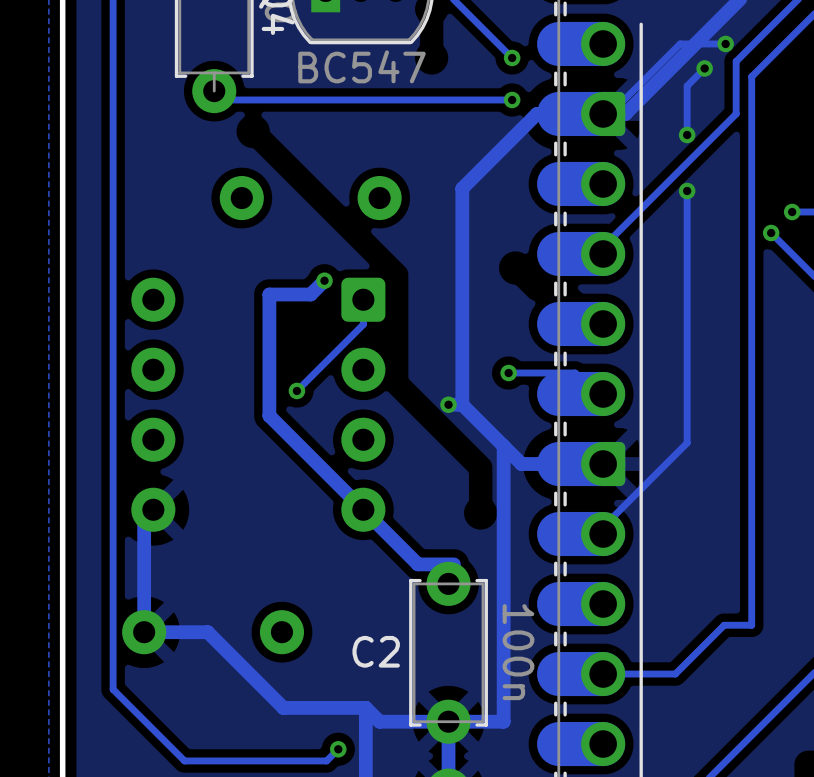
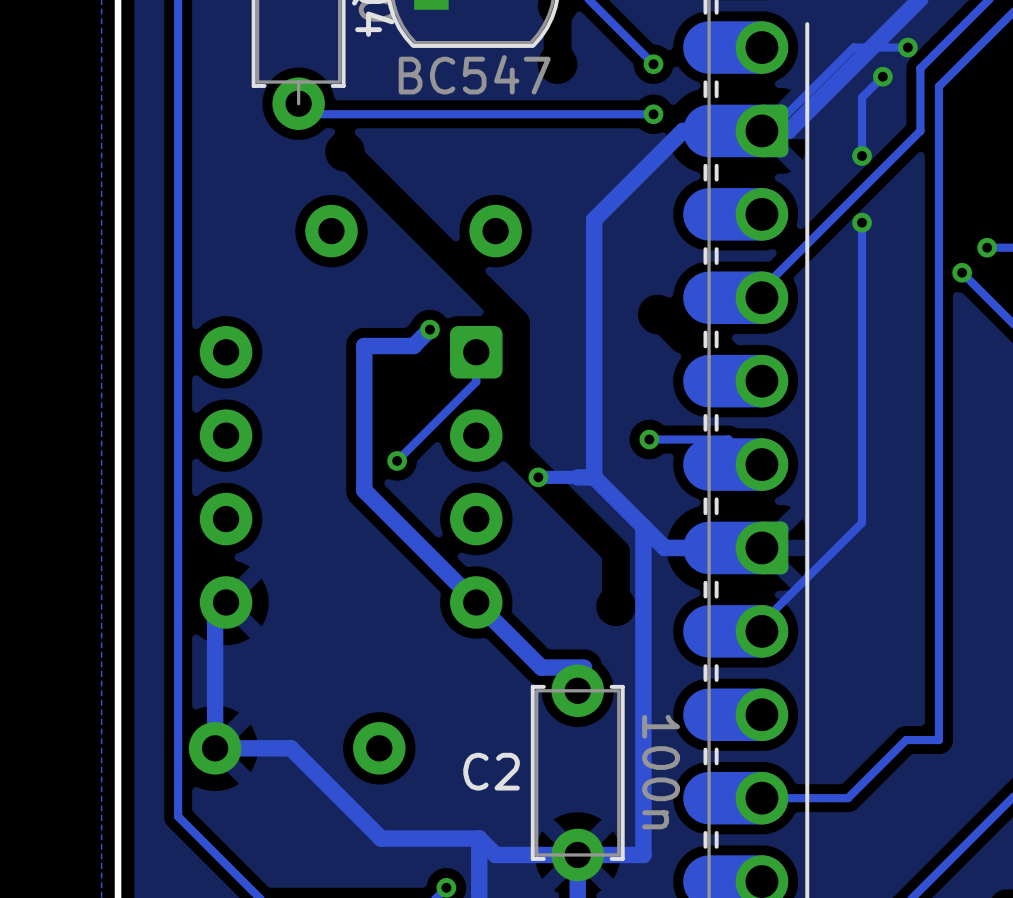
track: none -> (577, 477) (538, 477)
via position: (448, 404) -> (538, 477)

